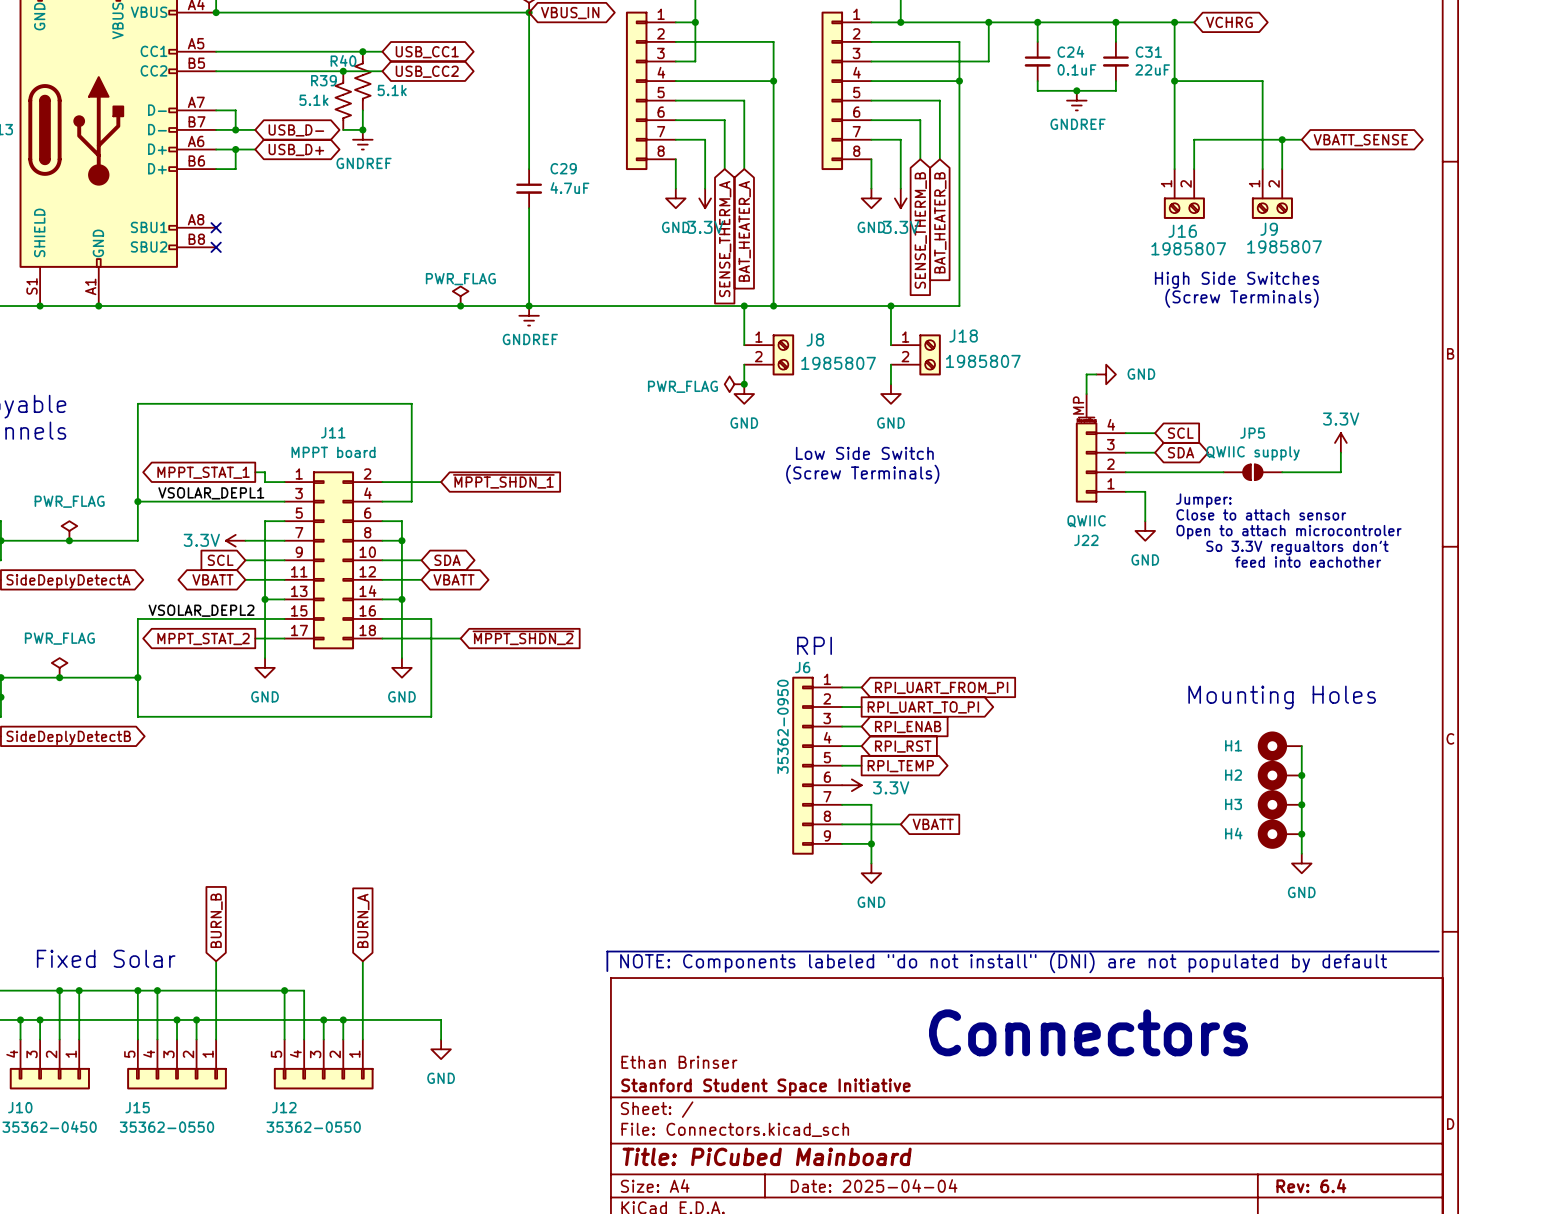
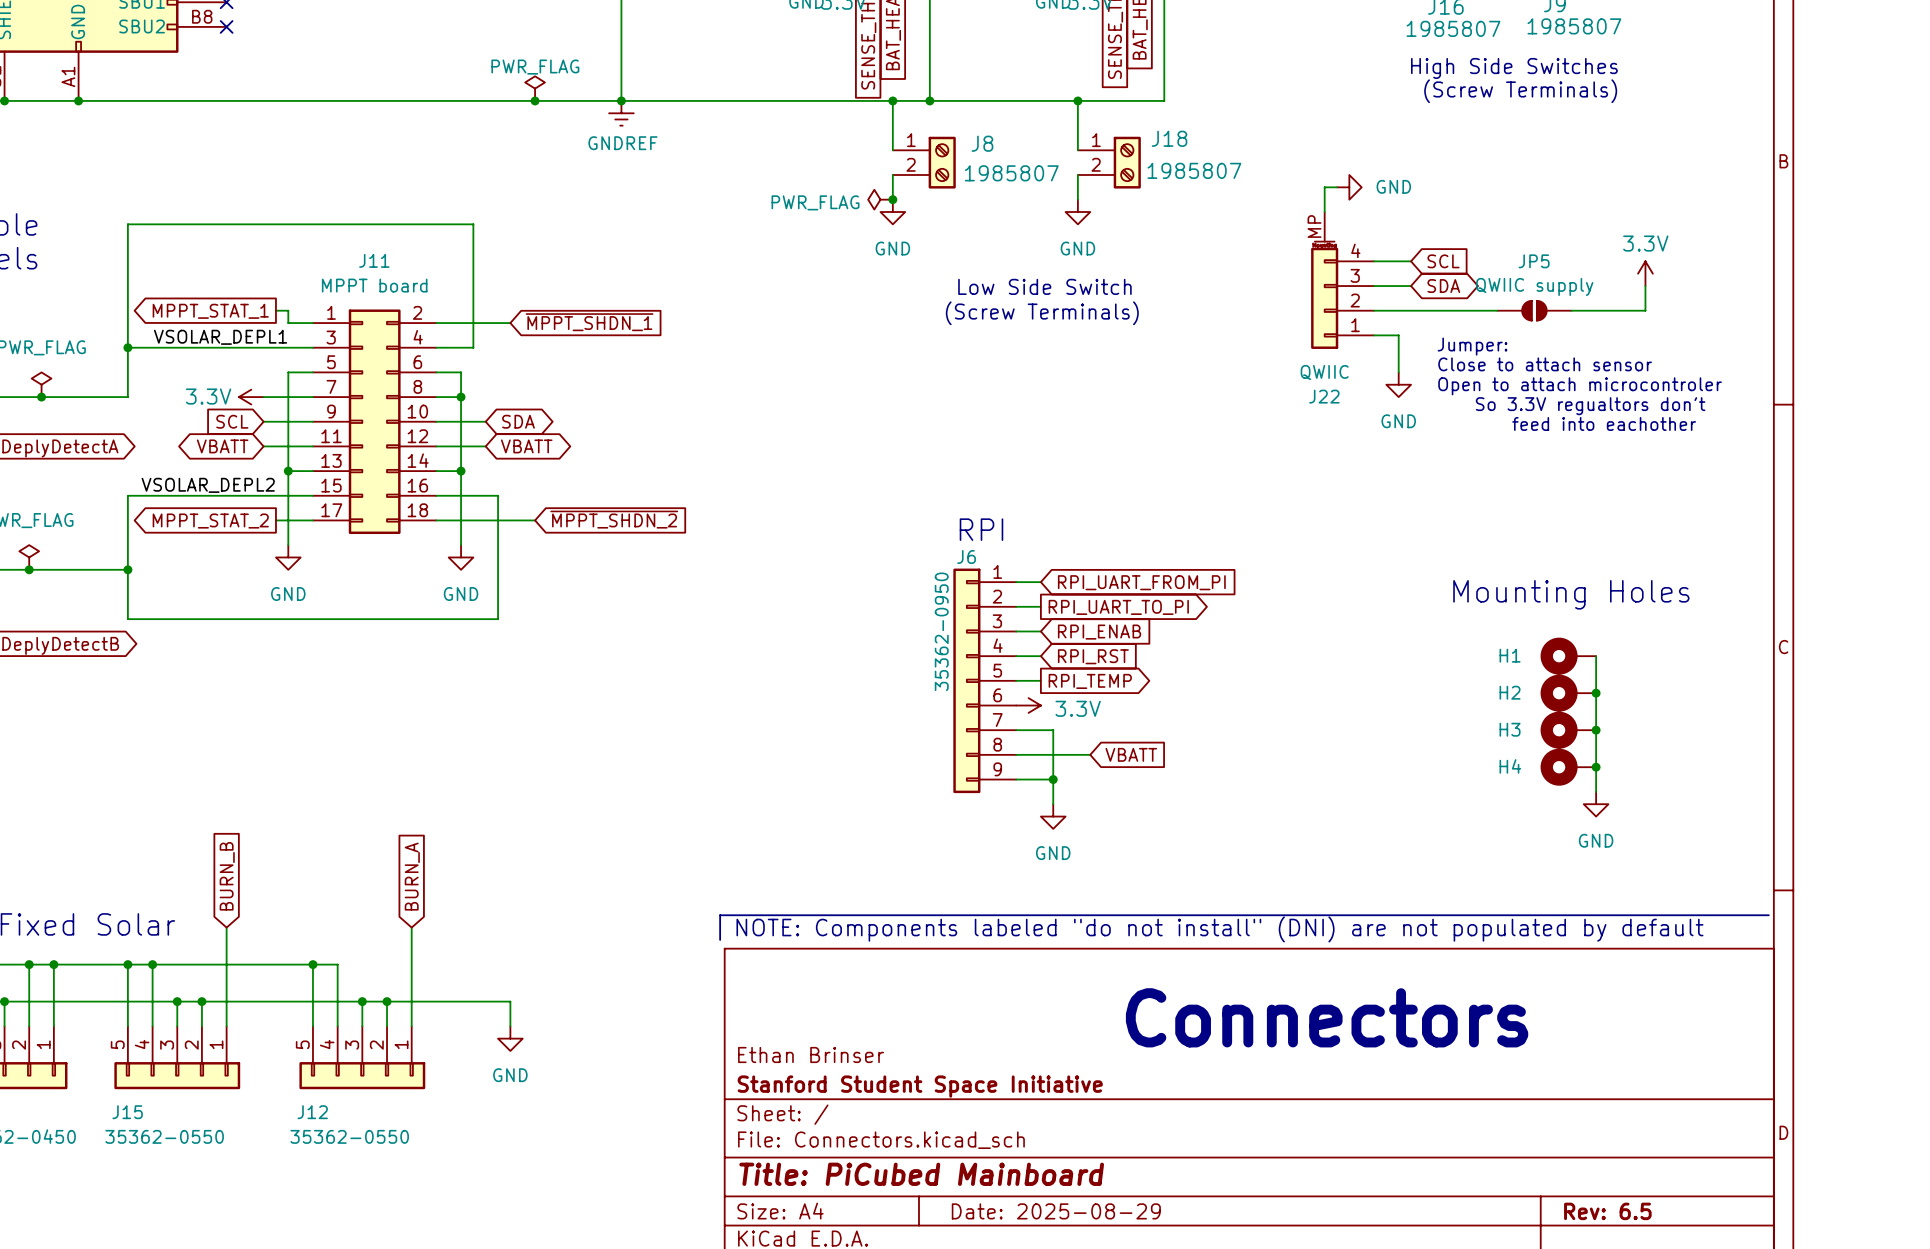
title block: Date: 2025-04-04 (874, 1186) -> Date: 2025-08-29 (1056, 1211)
title block: Rev: 6.4 (1311, 1186) -> Rev: 6.5 (1607, 1211)

